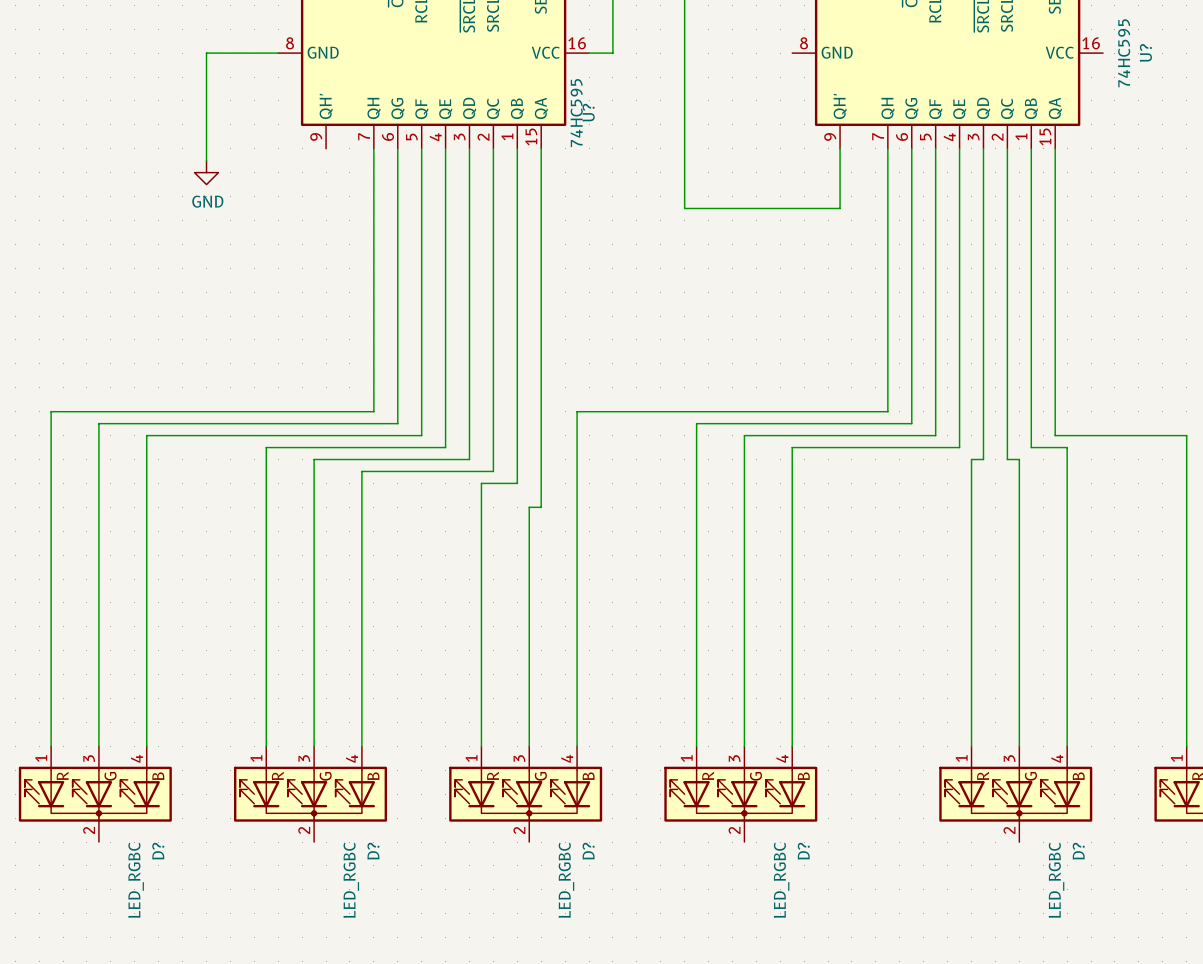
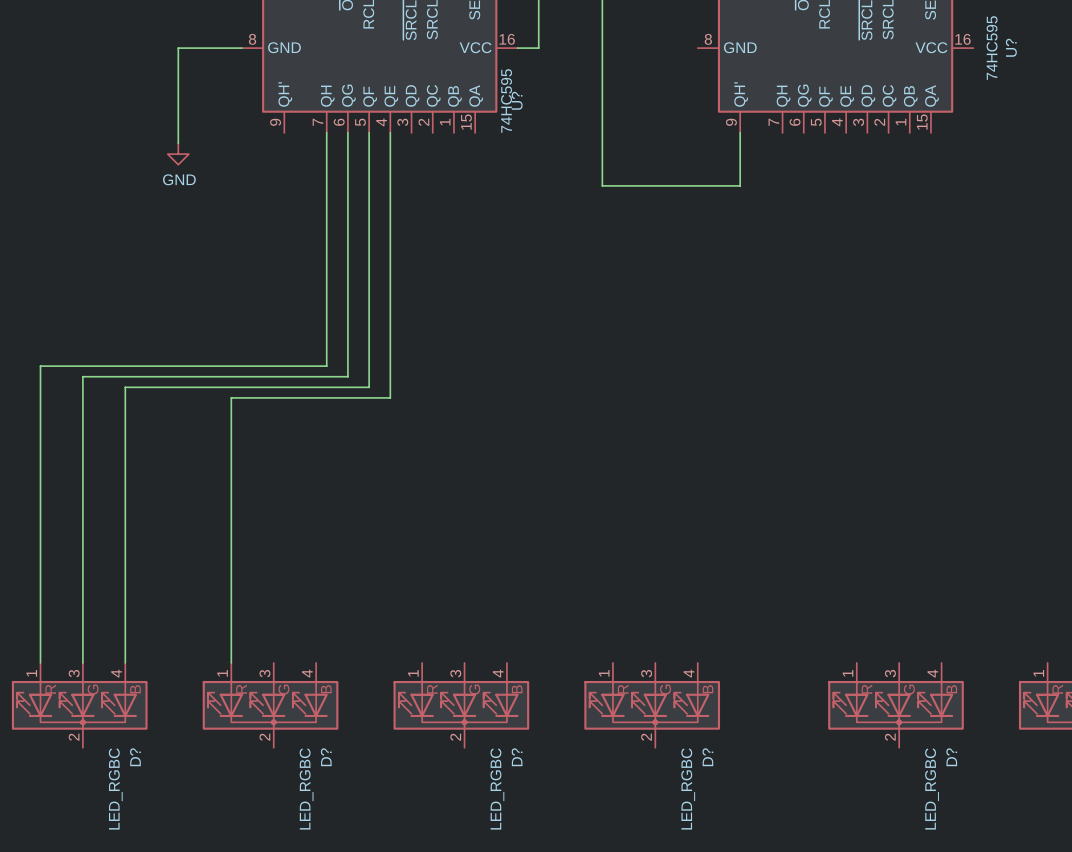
wire: (469, 148) (469, 459) (314, 459) (314, 746) -> none
wire: (493, 148) (493, 471) (361, 471) (361, 746) -> none
wire: (517, 148) (517, 483) (481, 483) (481, 746) -> none
wire: (541, 148) (541, 507) (529, 507) (529, 746) -> none
wire: (887, 148) (887, 411) (577, 411) (577, 746) -> none
wire: (911, 148) (911, 423) (696, 423) (696, 746) -> none
wire: (935, 148) (935, 435) (744, 435) (744, 746) -> none
wire: (959, 148) (959, 447) (792, 447) (792, 746) -> none
wire: (983, 148) (983, 459) (971, 459) (971, 746) -> none
wire: (1007, 148) (1007, 459) (1019, 459) (1019, 746) -> none
wire: (1031, 148) (1031, 447) (1067, 447) (1067, 746) -> none
wire: (1055, 148) (1055, 435) (1186, 435) (1186, 746) -> none

